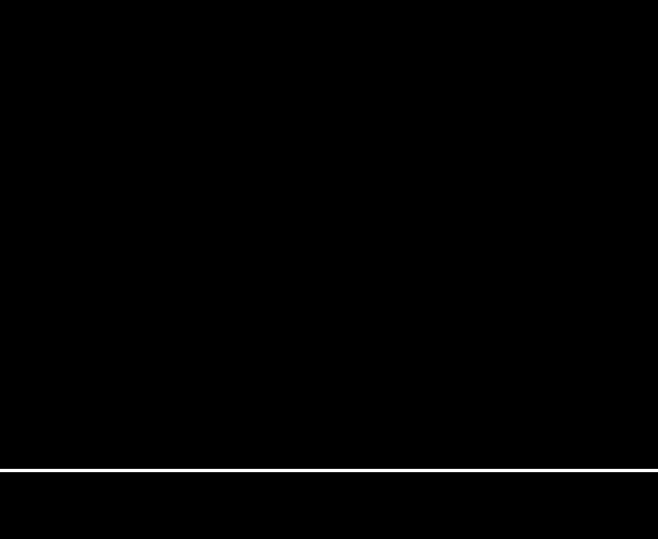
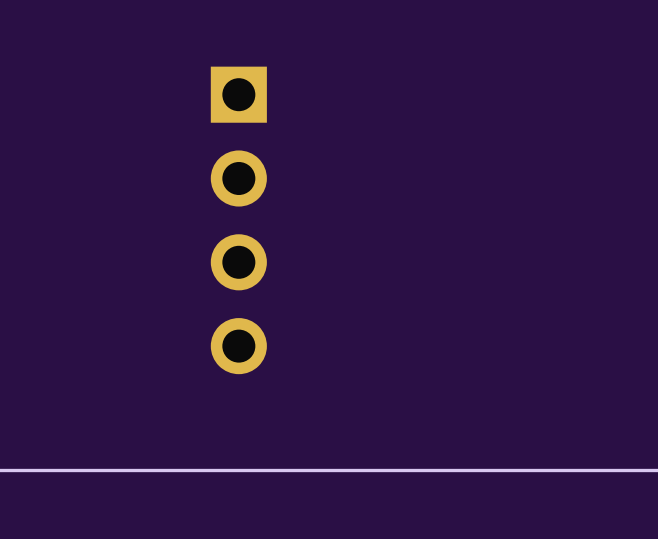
part: none -> (238, 220)

